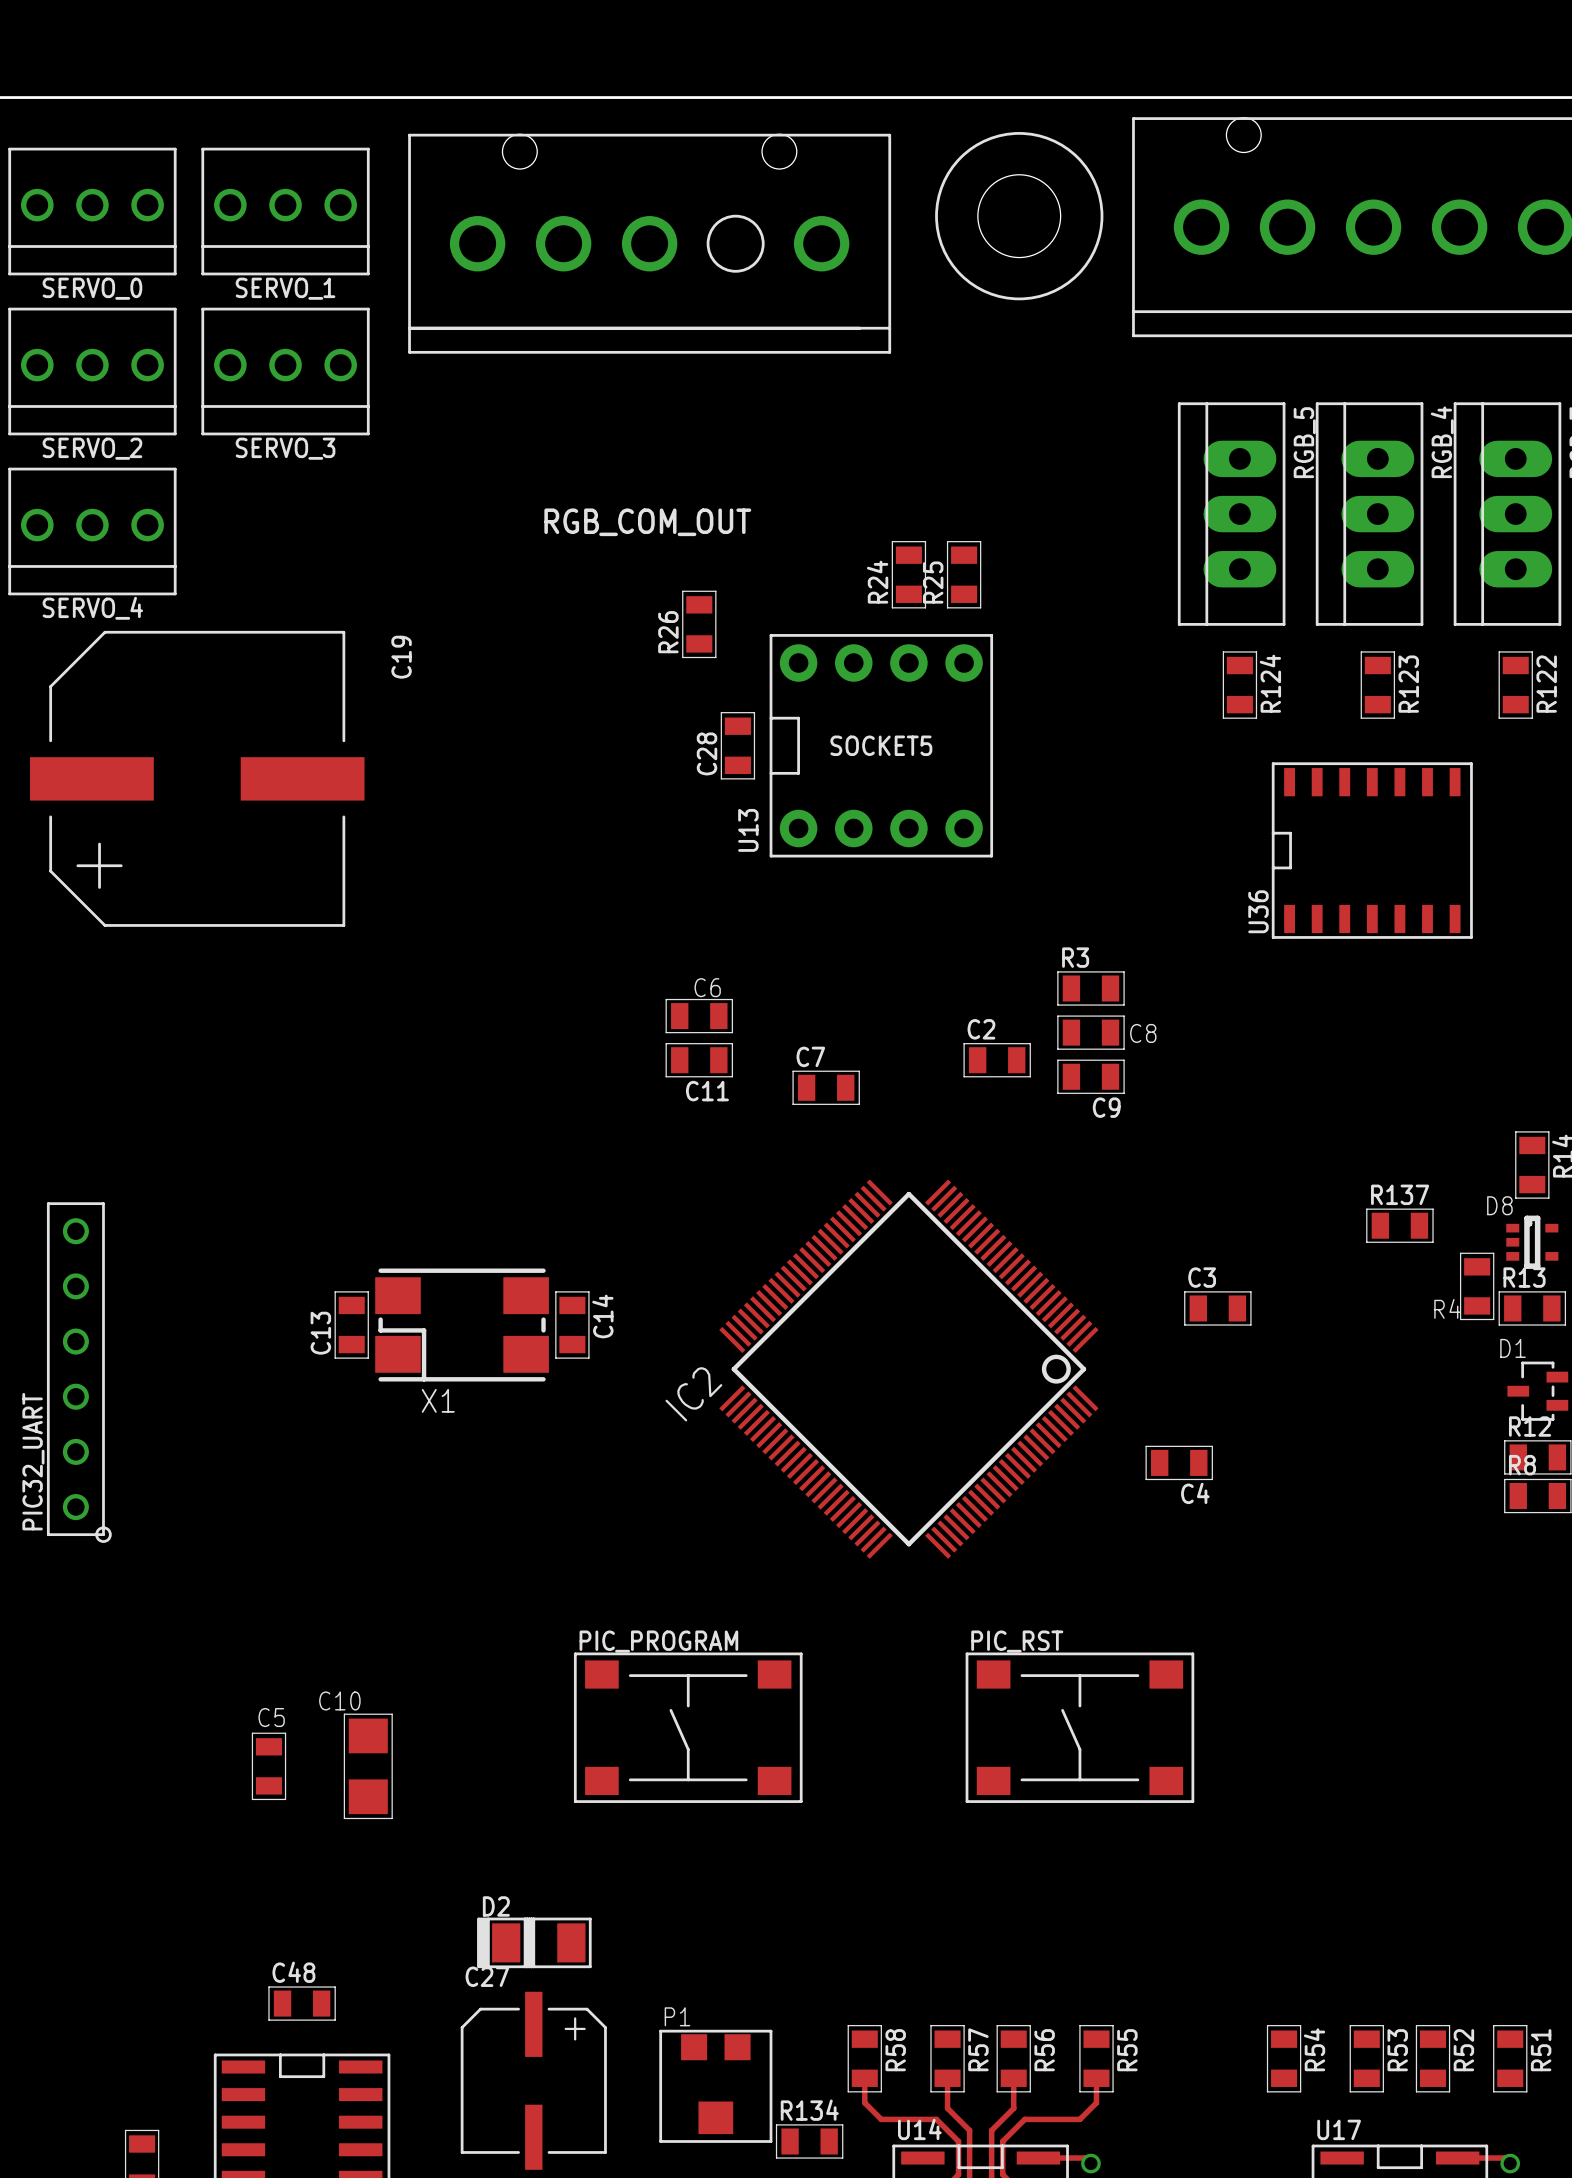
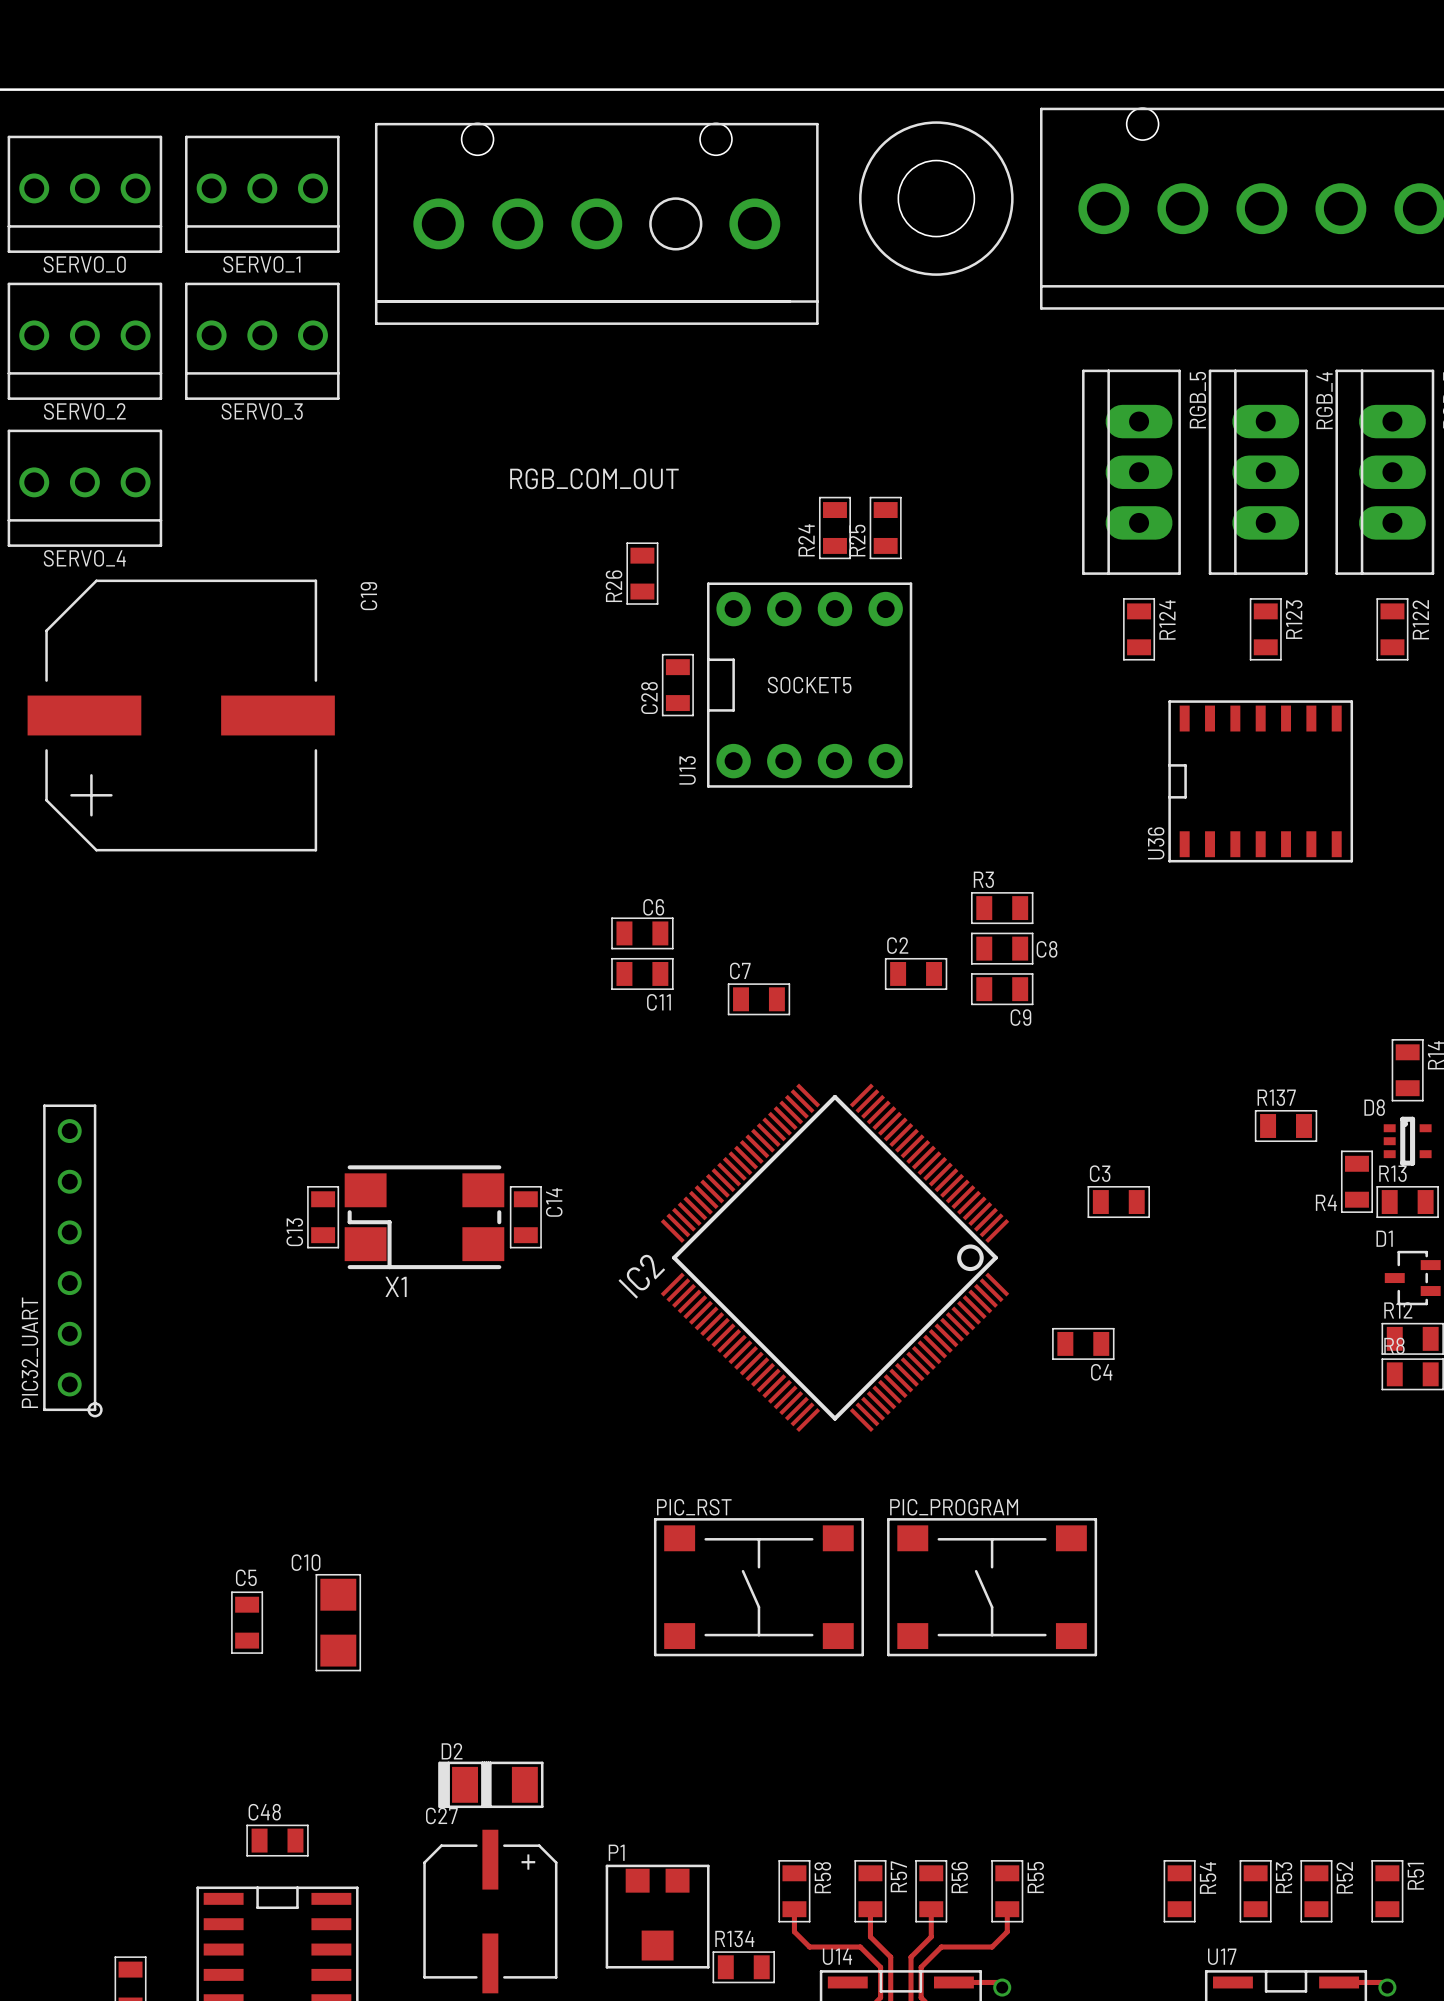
PIC_RST name: PIC_RST (1017, 1641) -> PIC_PROGRAM (954, 1507)
PIC_PROGRAM: (688, 1727) -> none
PIC_RST: none -> (758, 1587)

